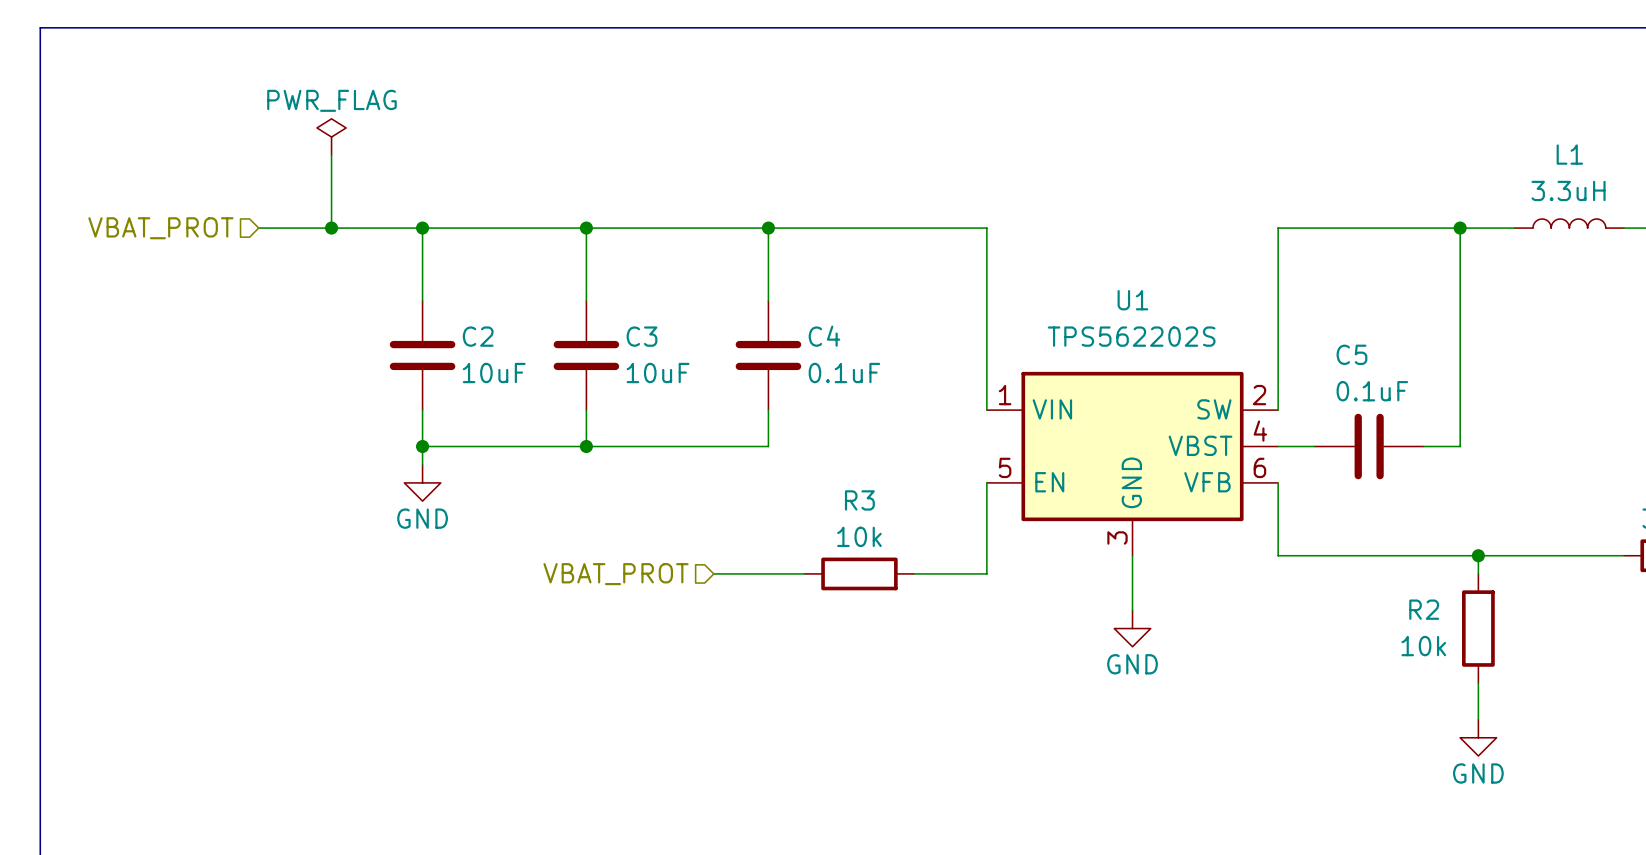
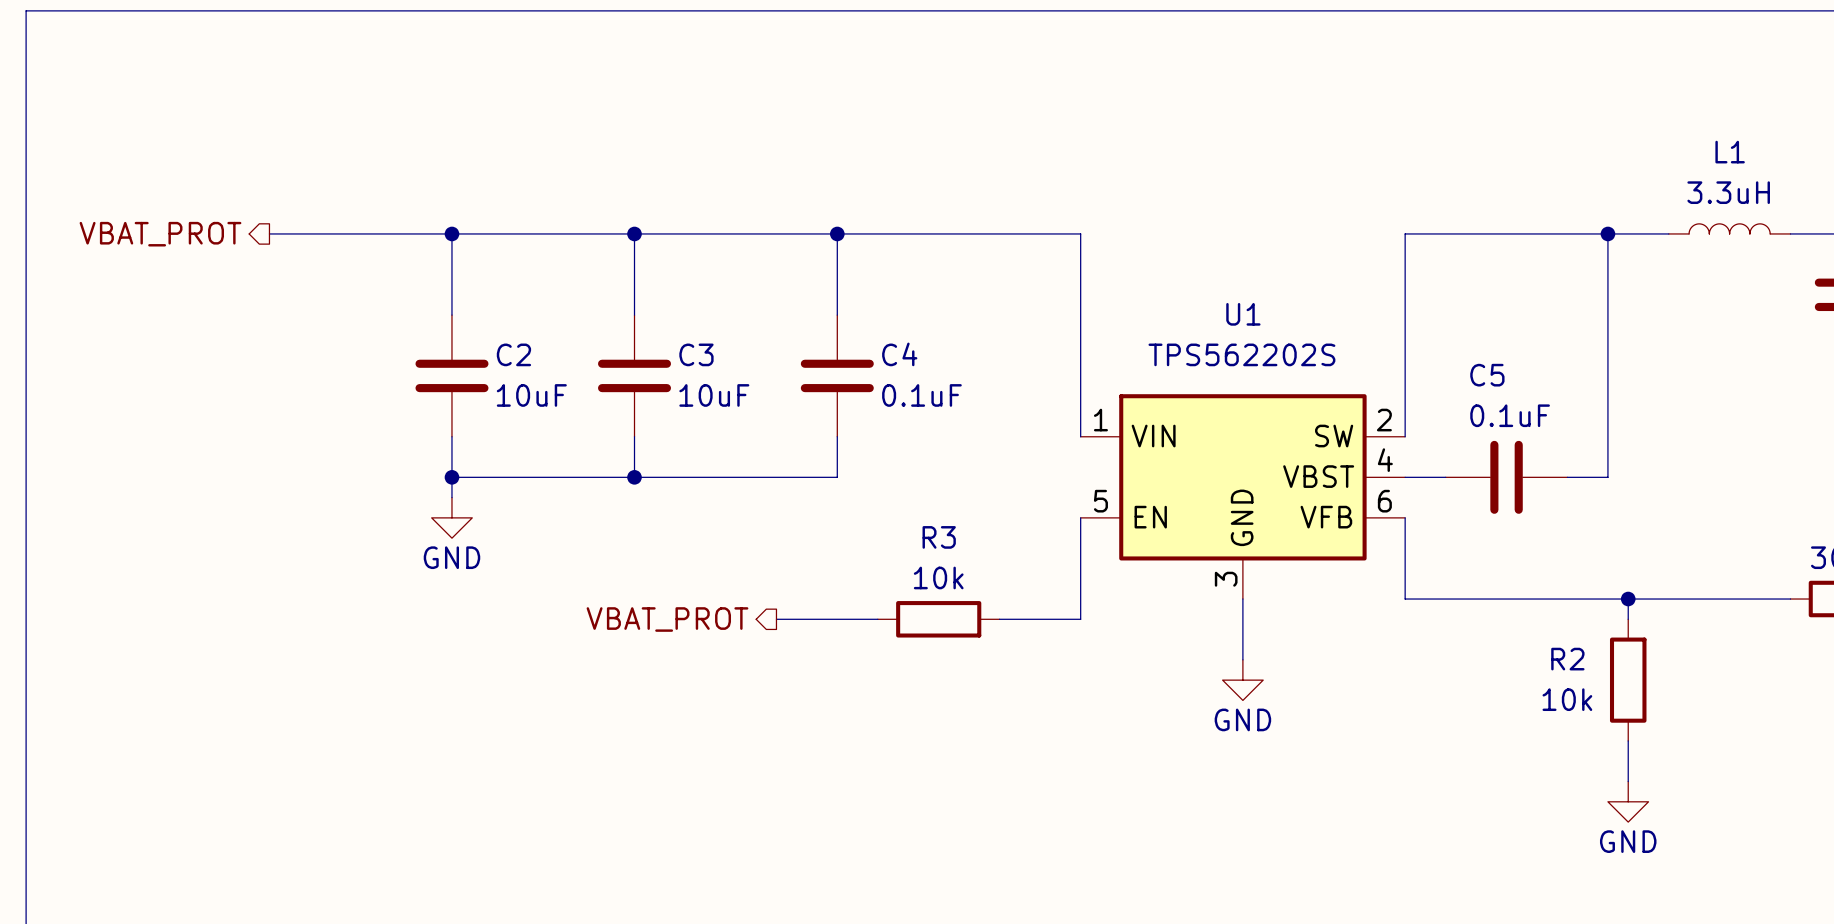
power symbol: PWR_FLAG (331, 137) -> none
wire: (331, 155) (331, 228) -> none
hierarchical label shape: input (160, 228) -> output (160, 234)
junction: (331, 228) -> none
hierarchical label shape: input (616, 574) -> output (667, 619)

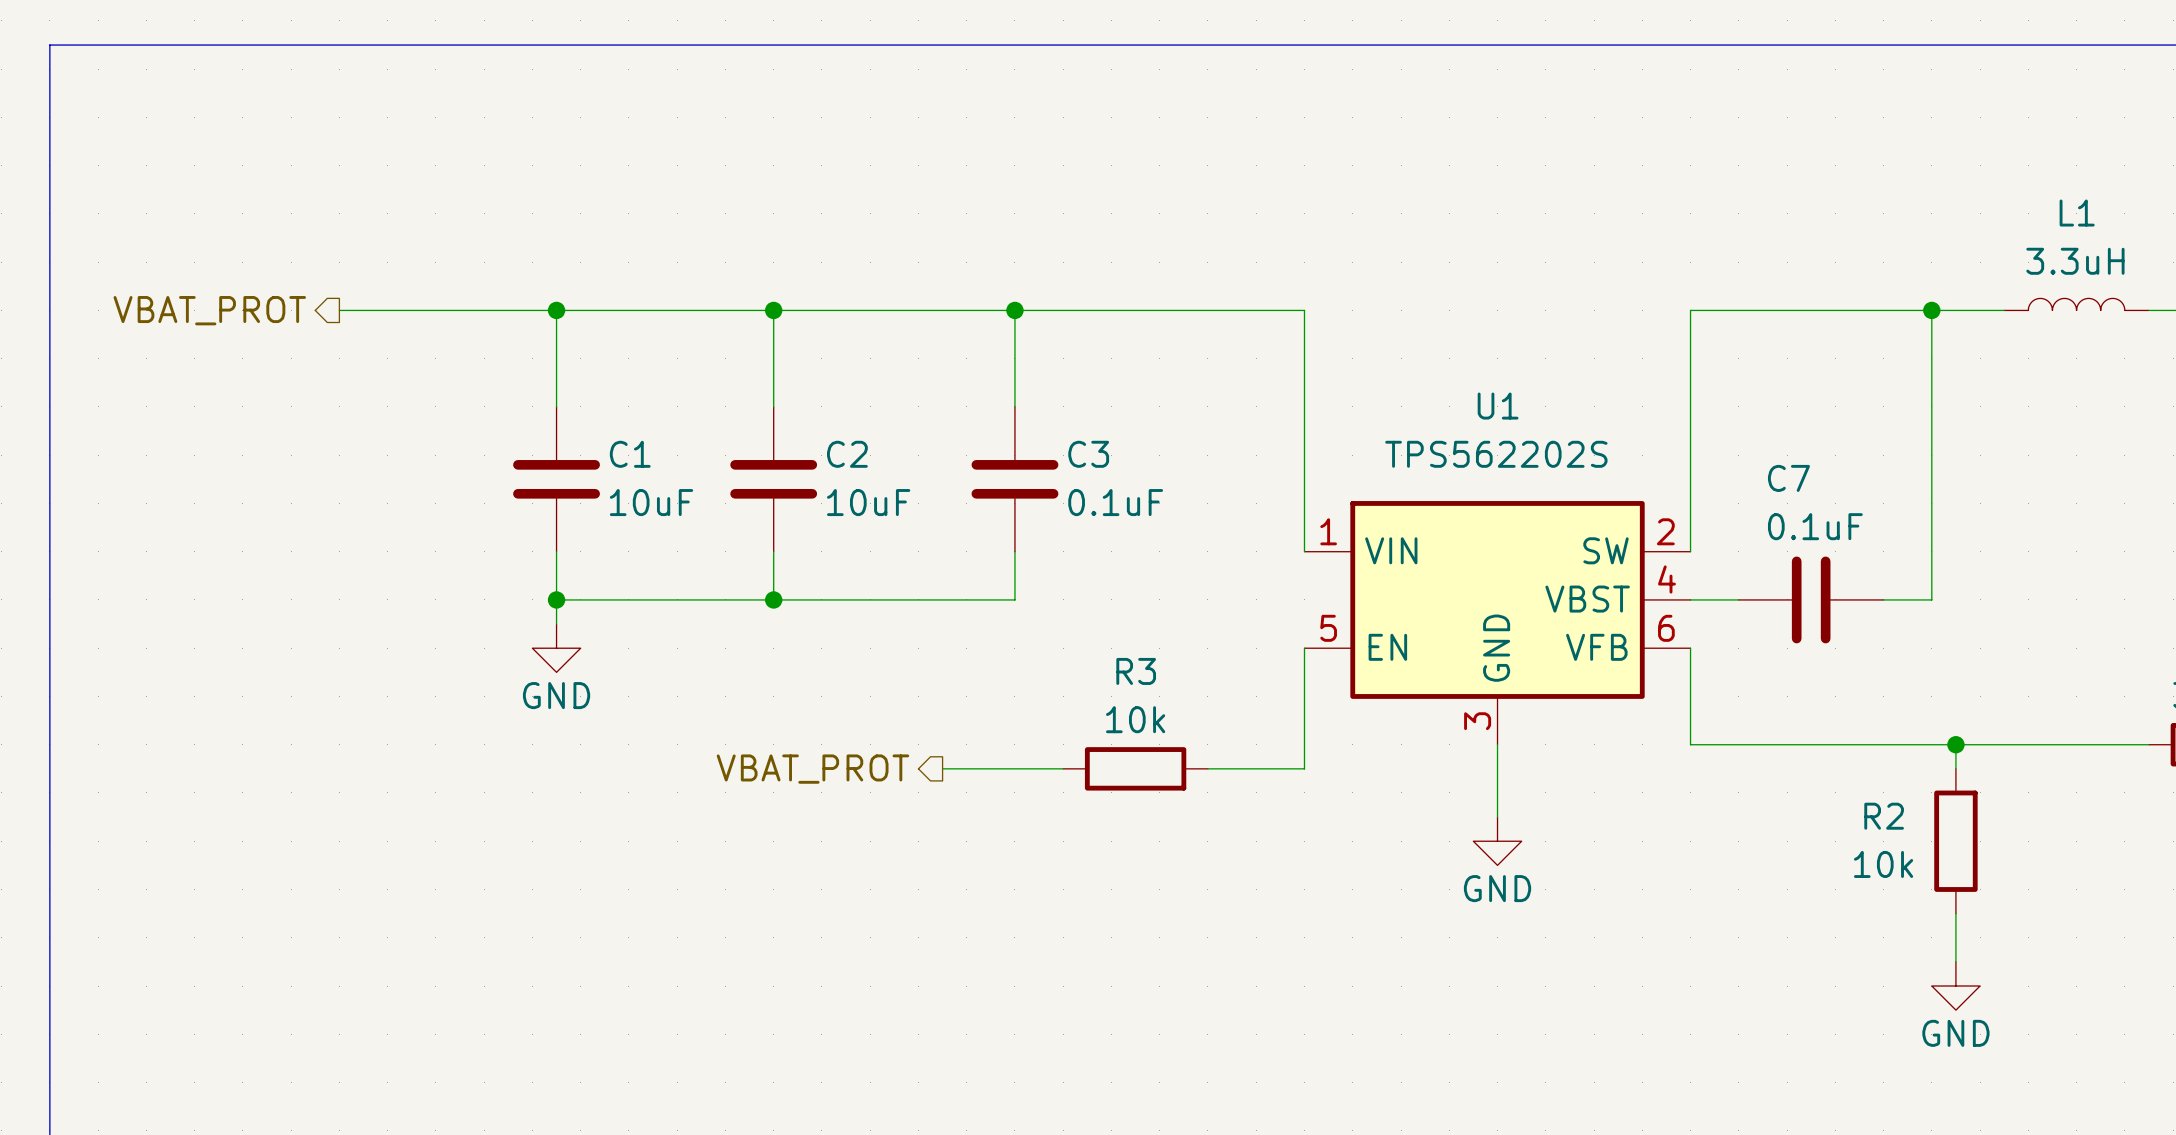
C2 name: C2 (513, 354) -> C1 (630, 454)
C3 name: C3 (696, 354) -> C2 (847, 454)
C4 name: C4 (899, 354) -> C3 (1088, 454)
C5 name: C5 (1487, 375) -> C7 (1788, 478)

